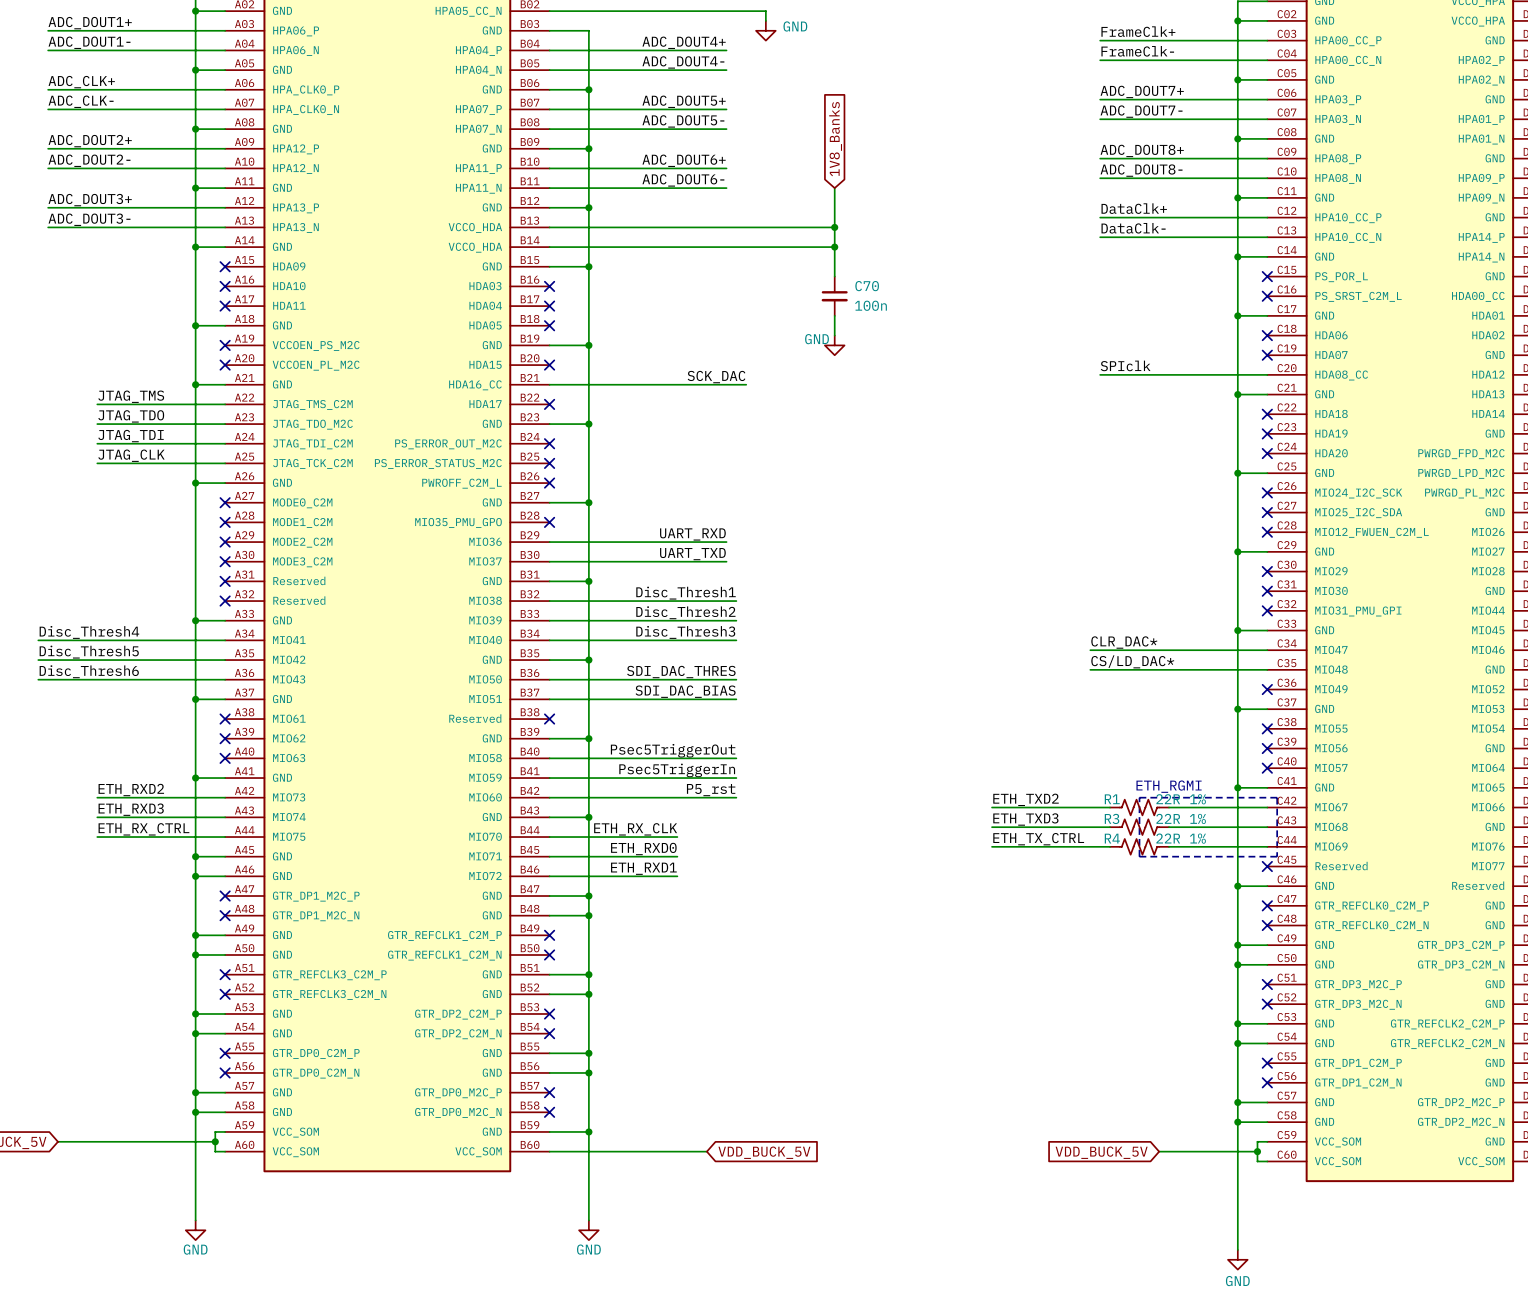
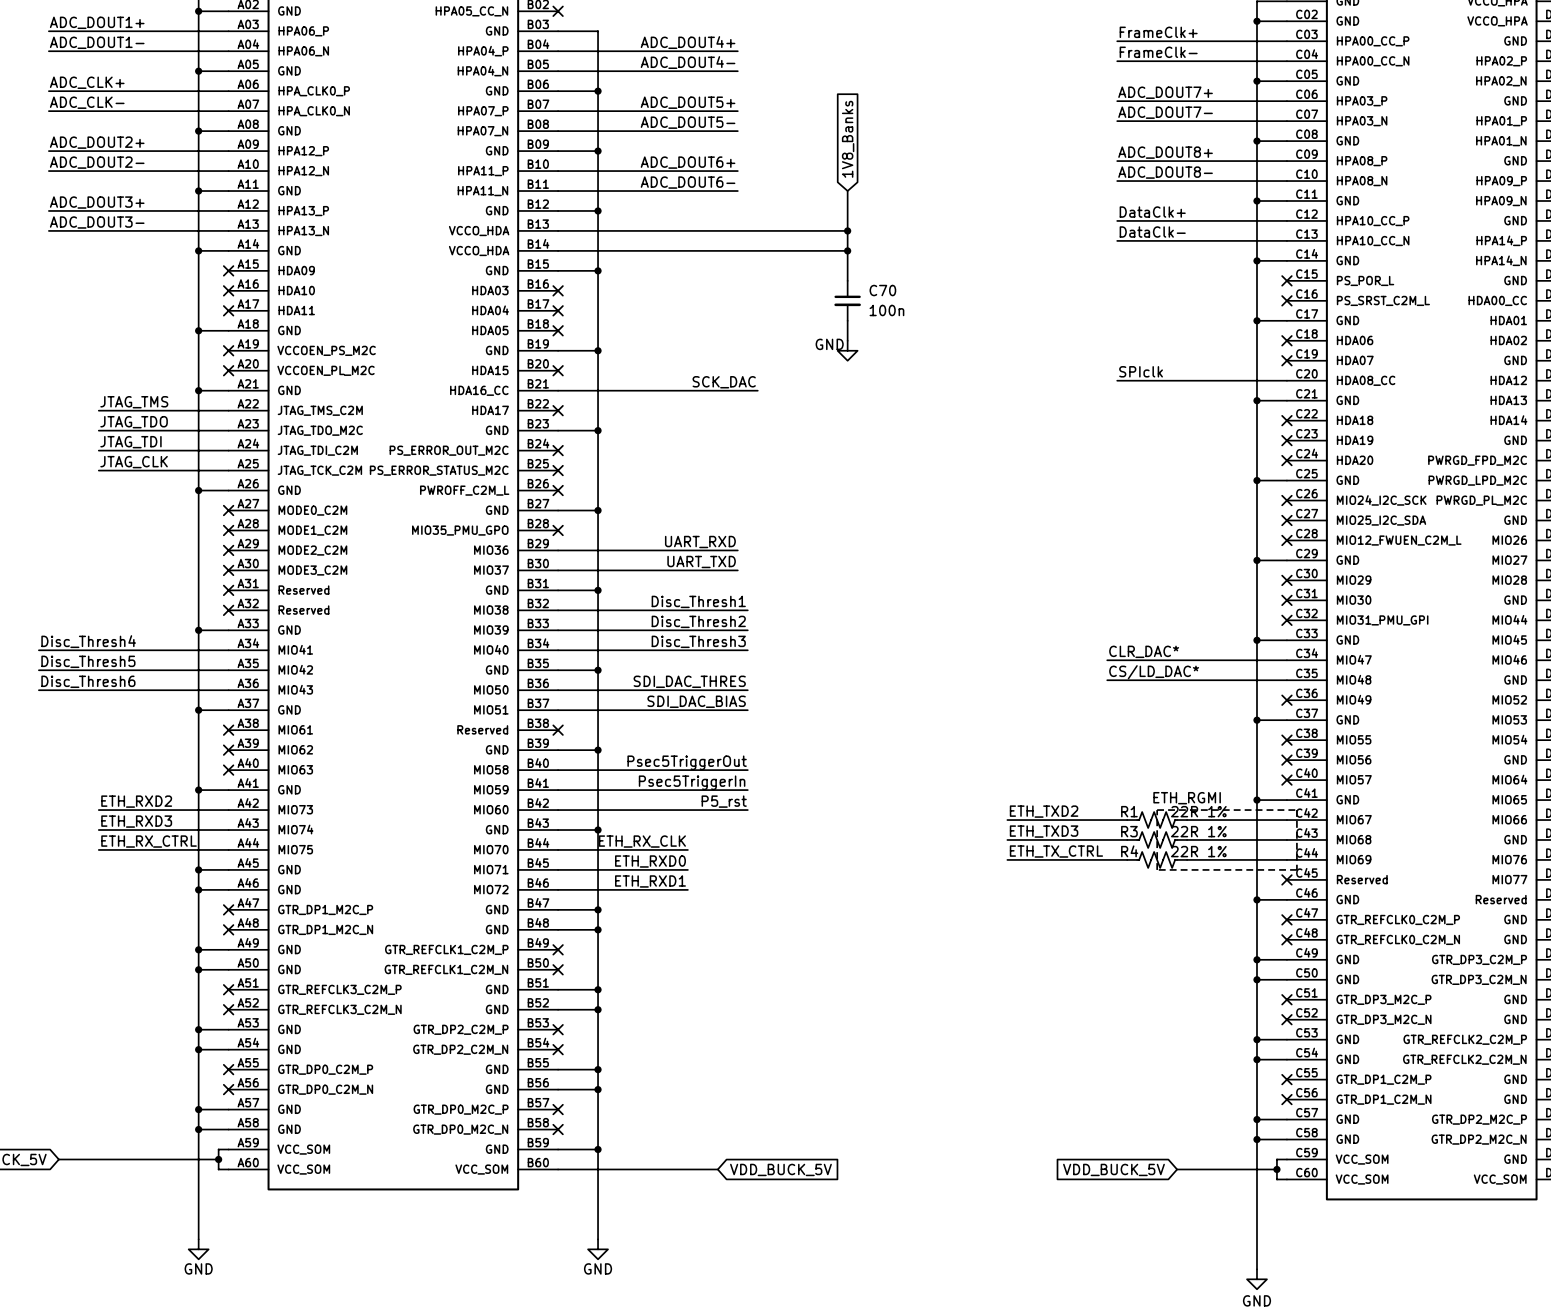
wire: (549, 11) (765, 11) (765, 20) -> none
no-connect mark: none -> (558, 11)
power symbol: GND (765, 30) -> none

